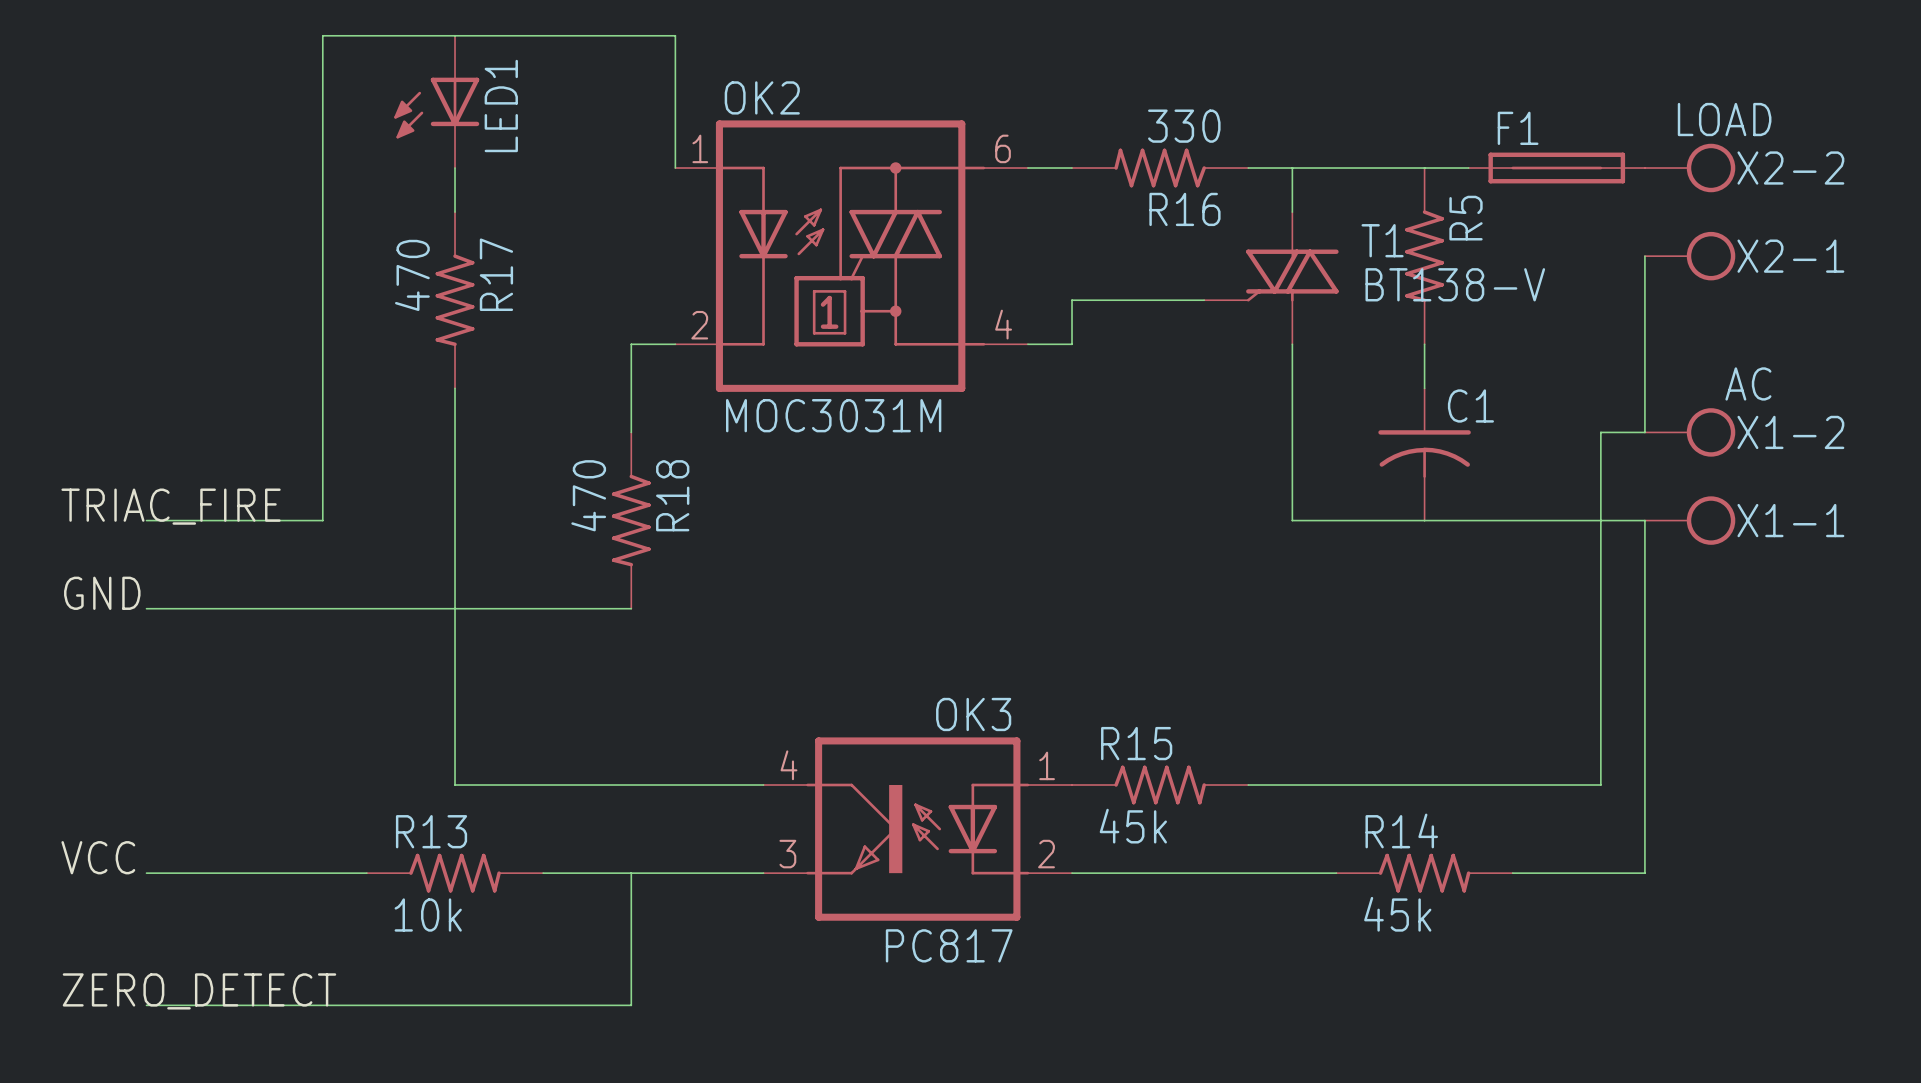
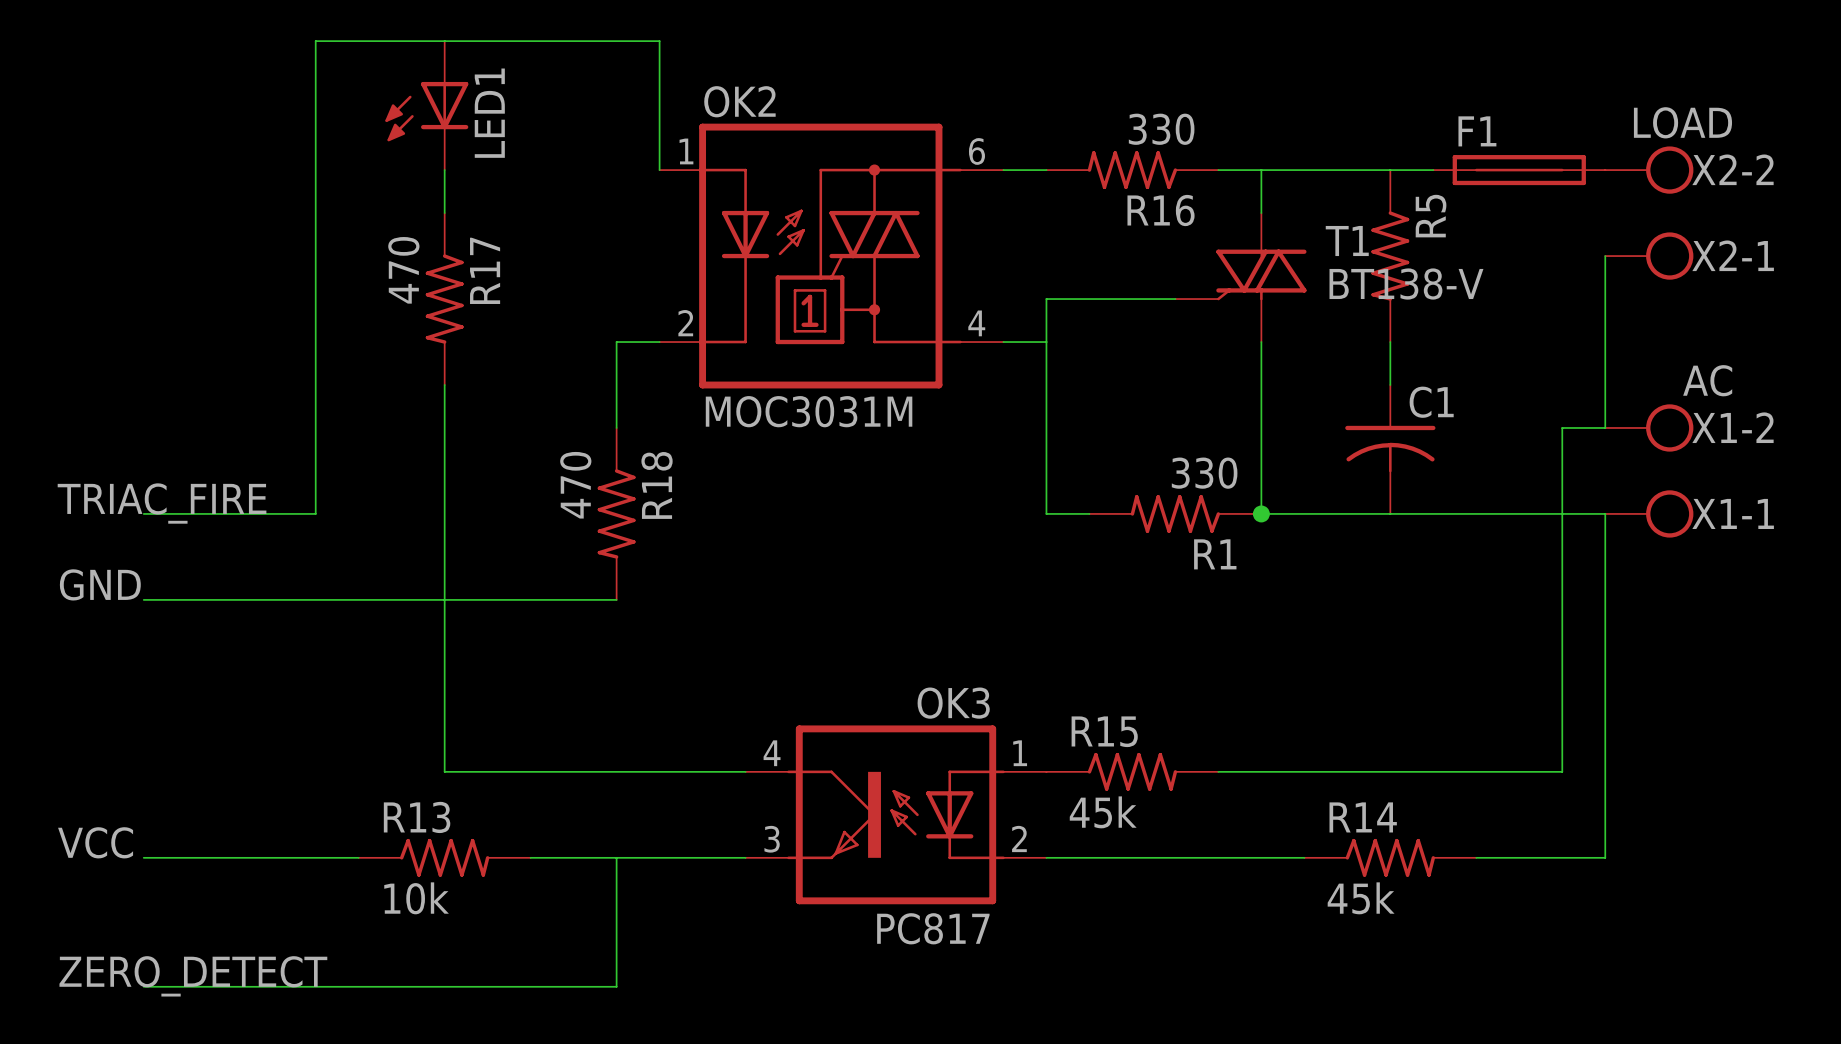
wire: none -> (1046, 342) (1046, 513) (1089, 513)
R1: none -> 330 (1175, 513)
junction: none -> (1261, 513)

